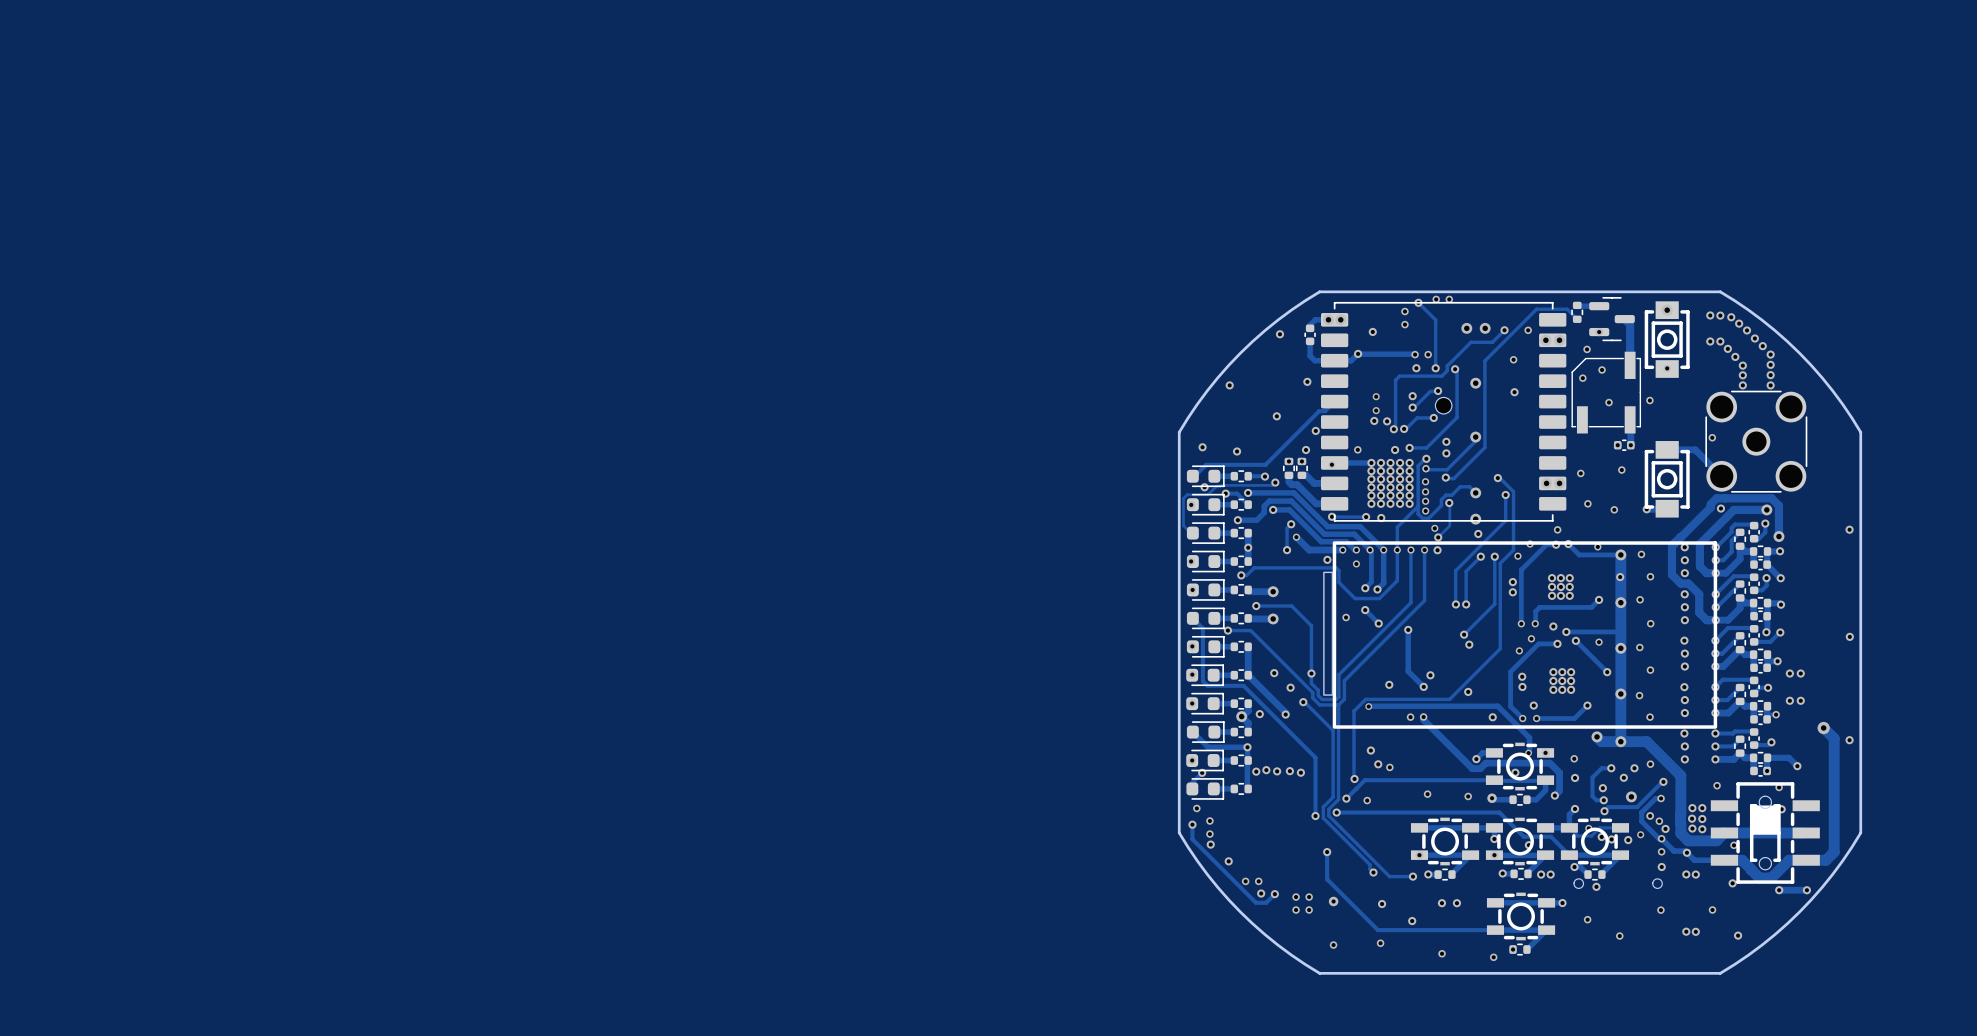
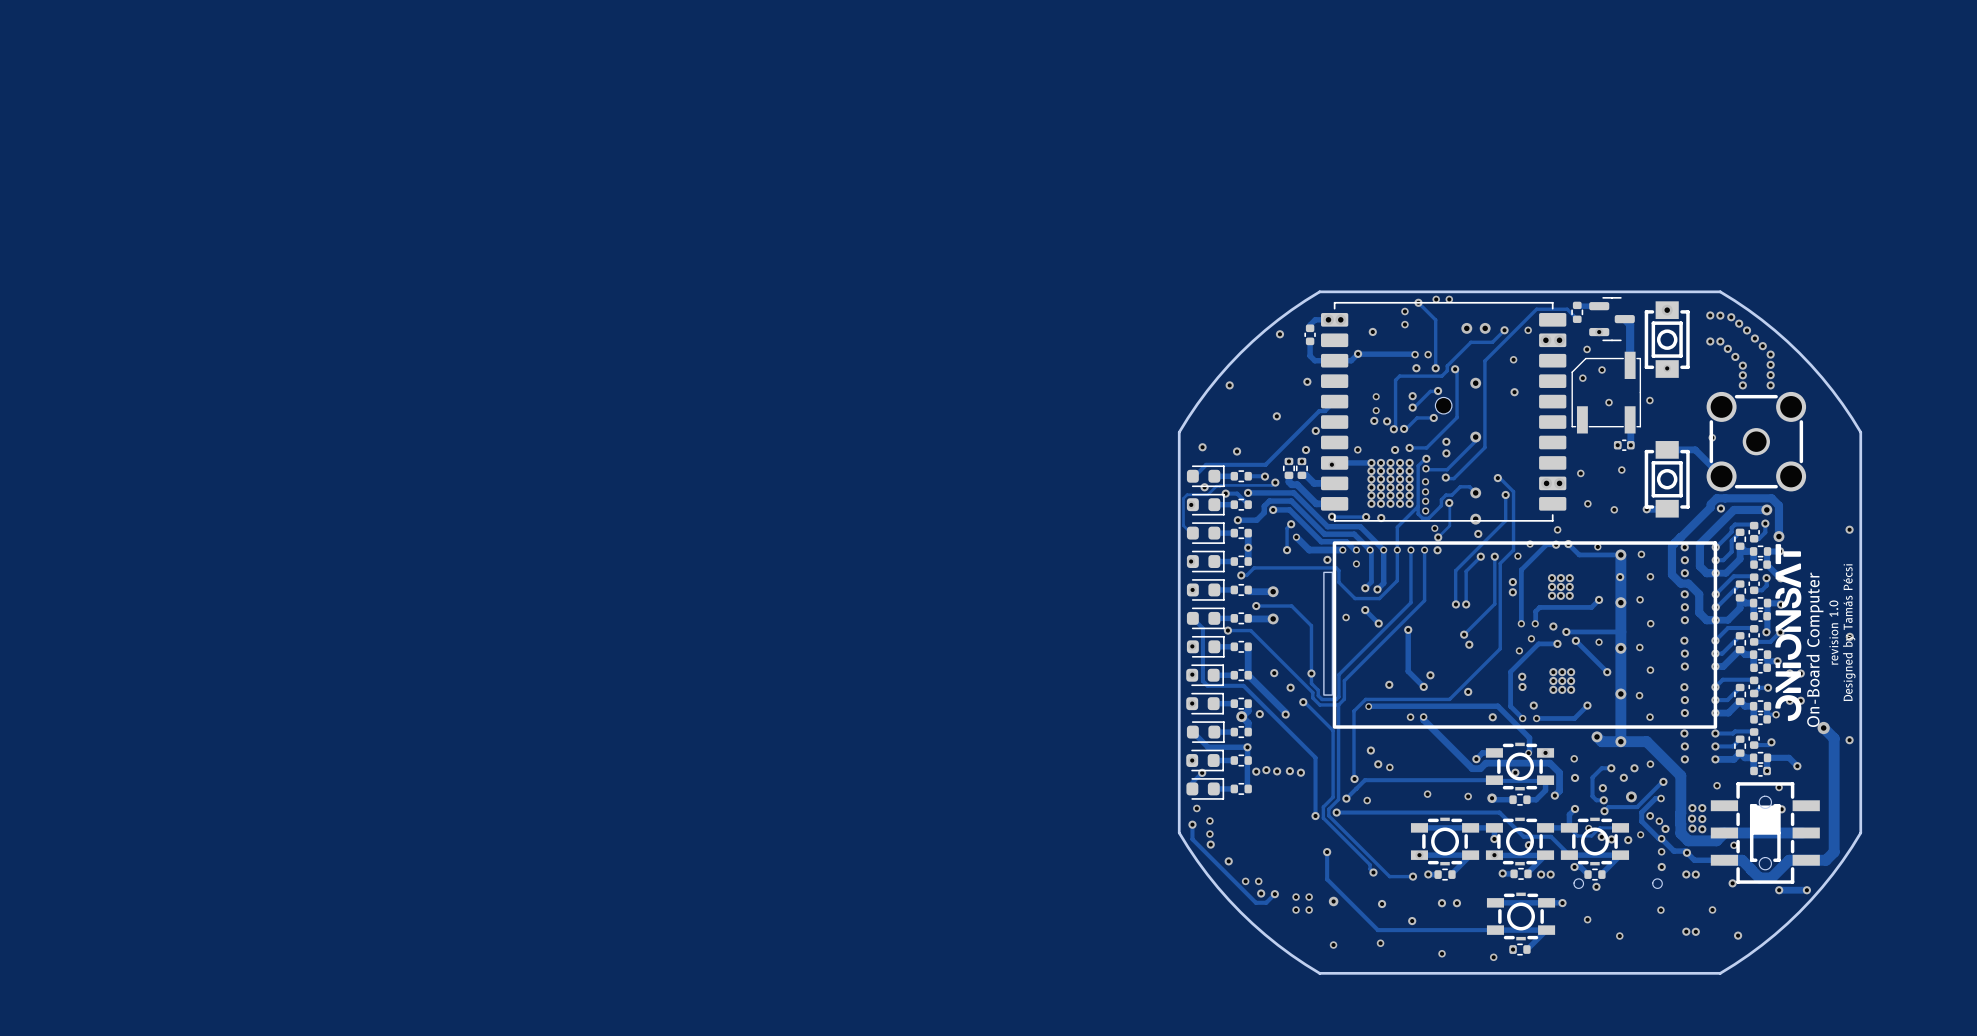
part footprint: [1705, 390, 1808, 493] -> [1706, 391, 1807, 492]
drawing: none -> [1775, 544, 1802, 722]
text: none -> revision 1.0 (1833, 632)
text: none -> Designed by Tamás Pécsi (1849, 632)
text: none -> On-Board Computer (1814, 649)

